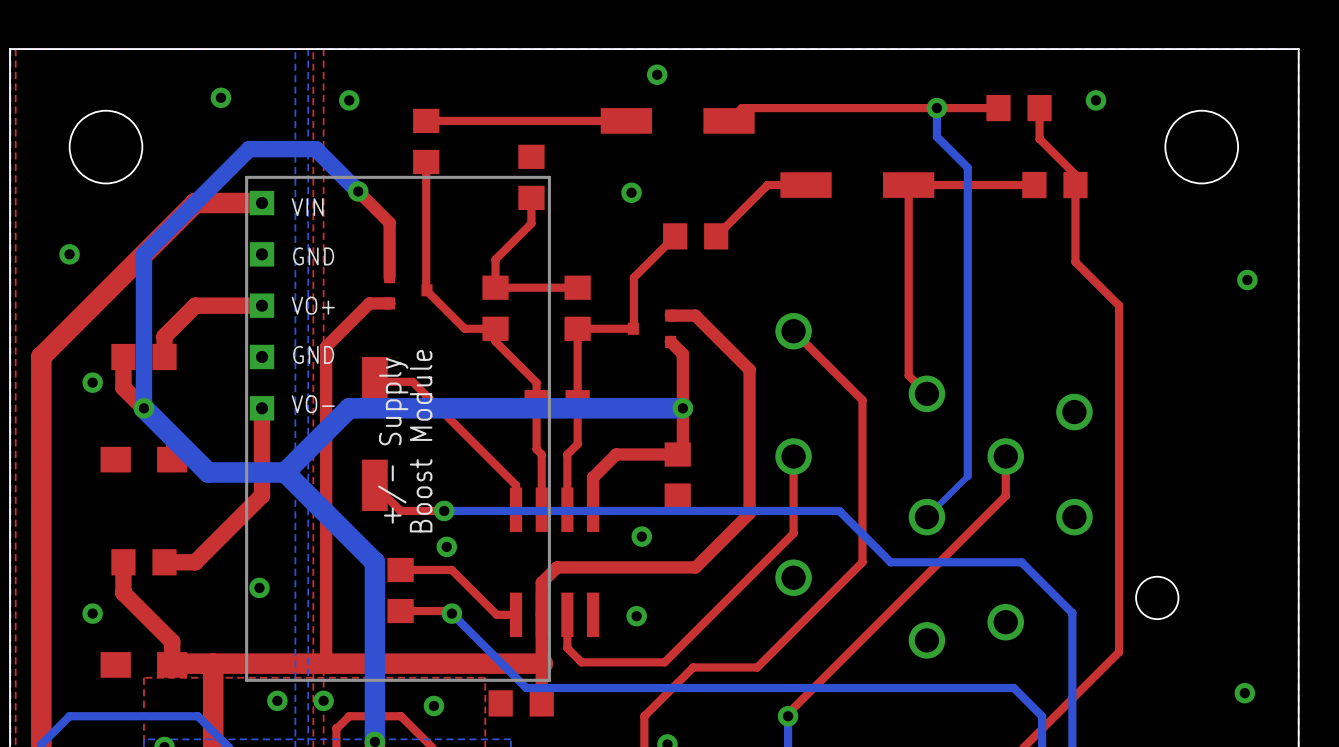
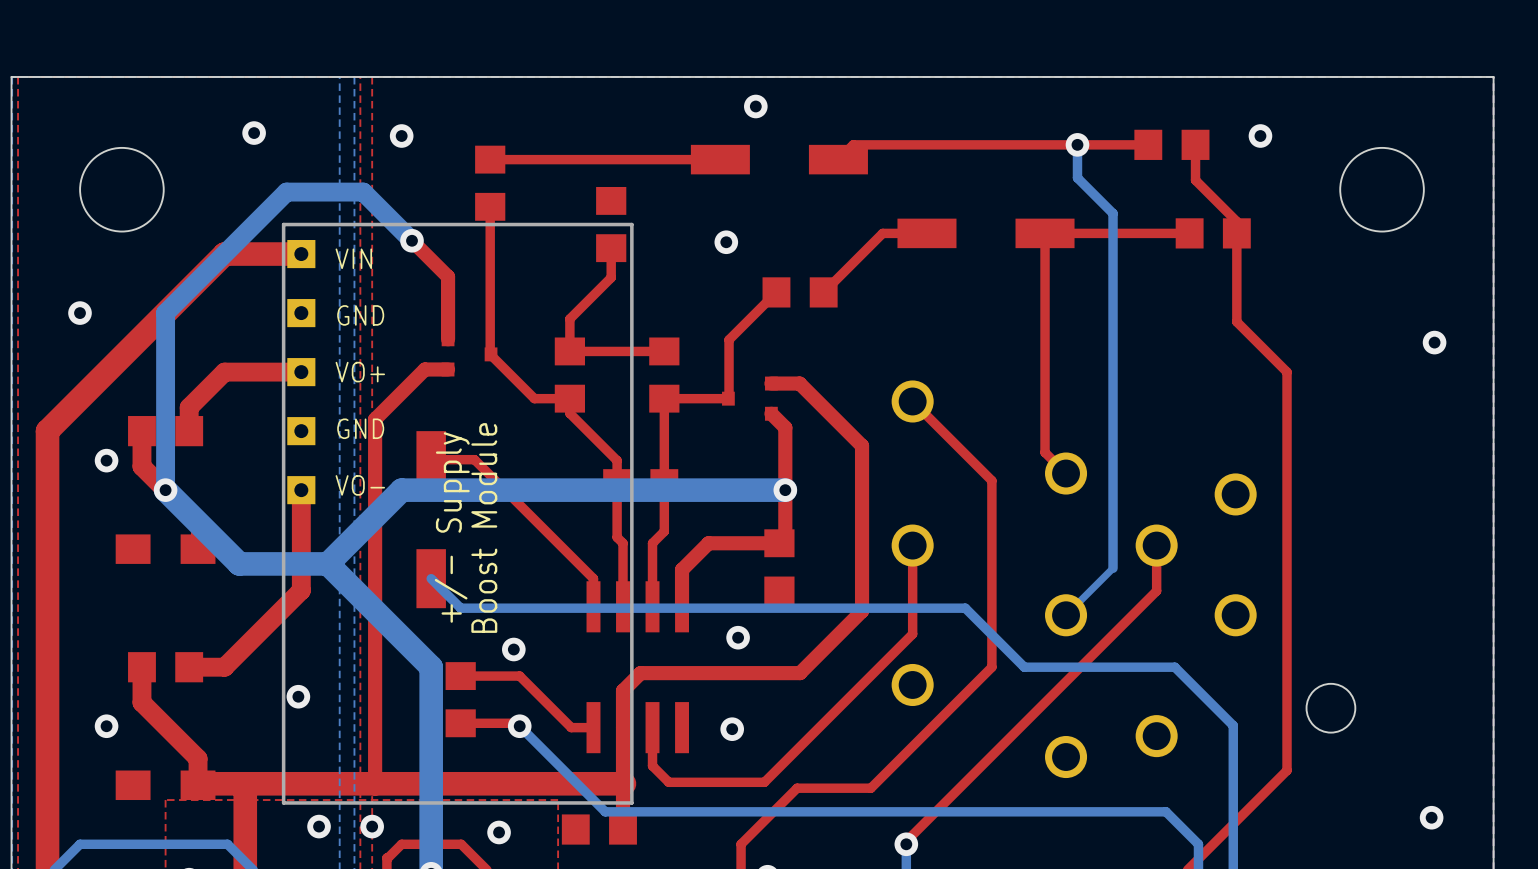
top track: (374, 485) (400, 510) (444, 510) -> none
bottom track: none -> (431, 578) (460, 608) (510, 608)
via: (444, 510) -> none

